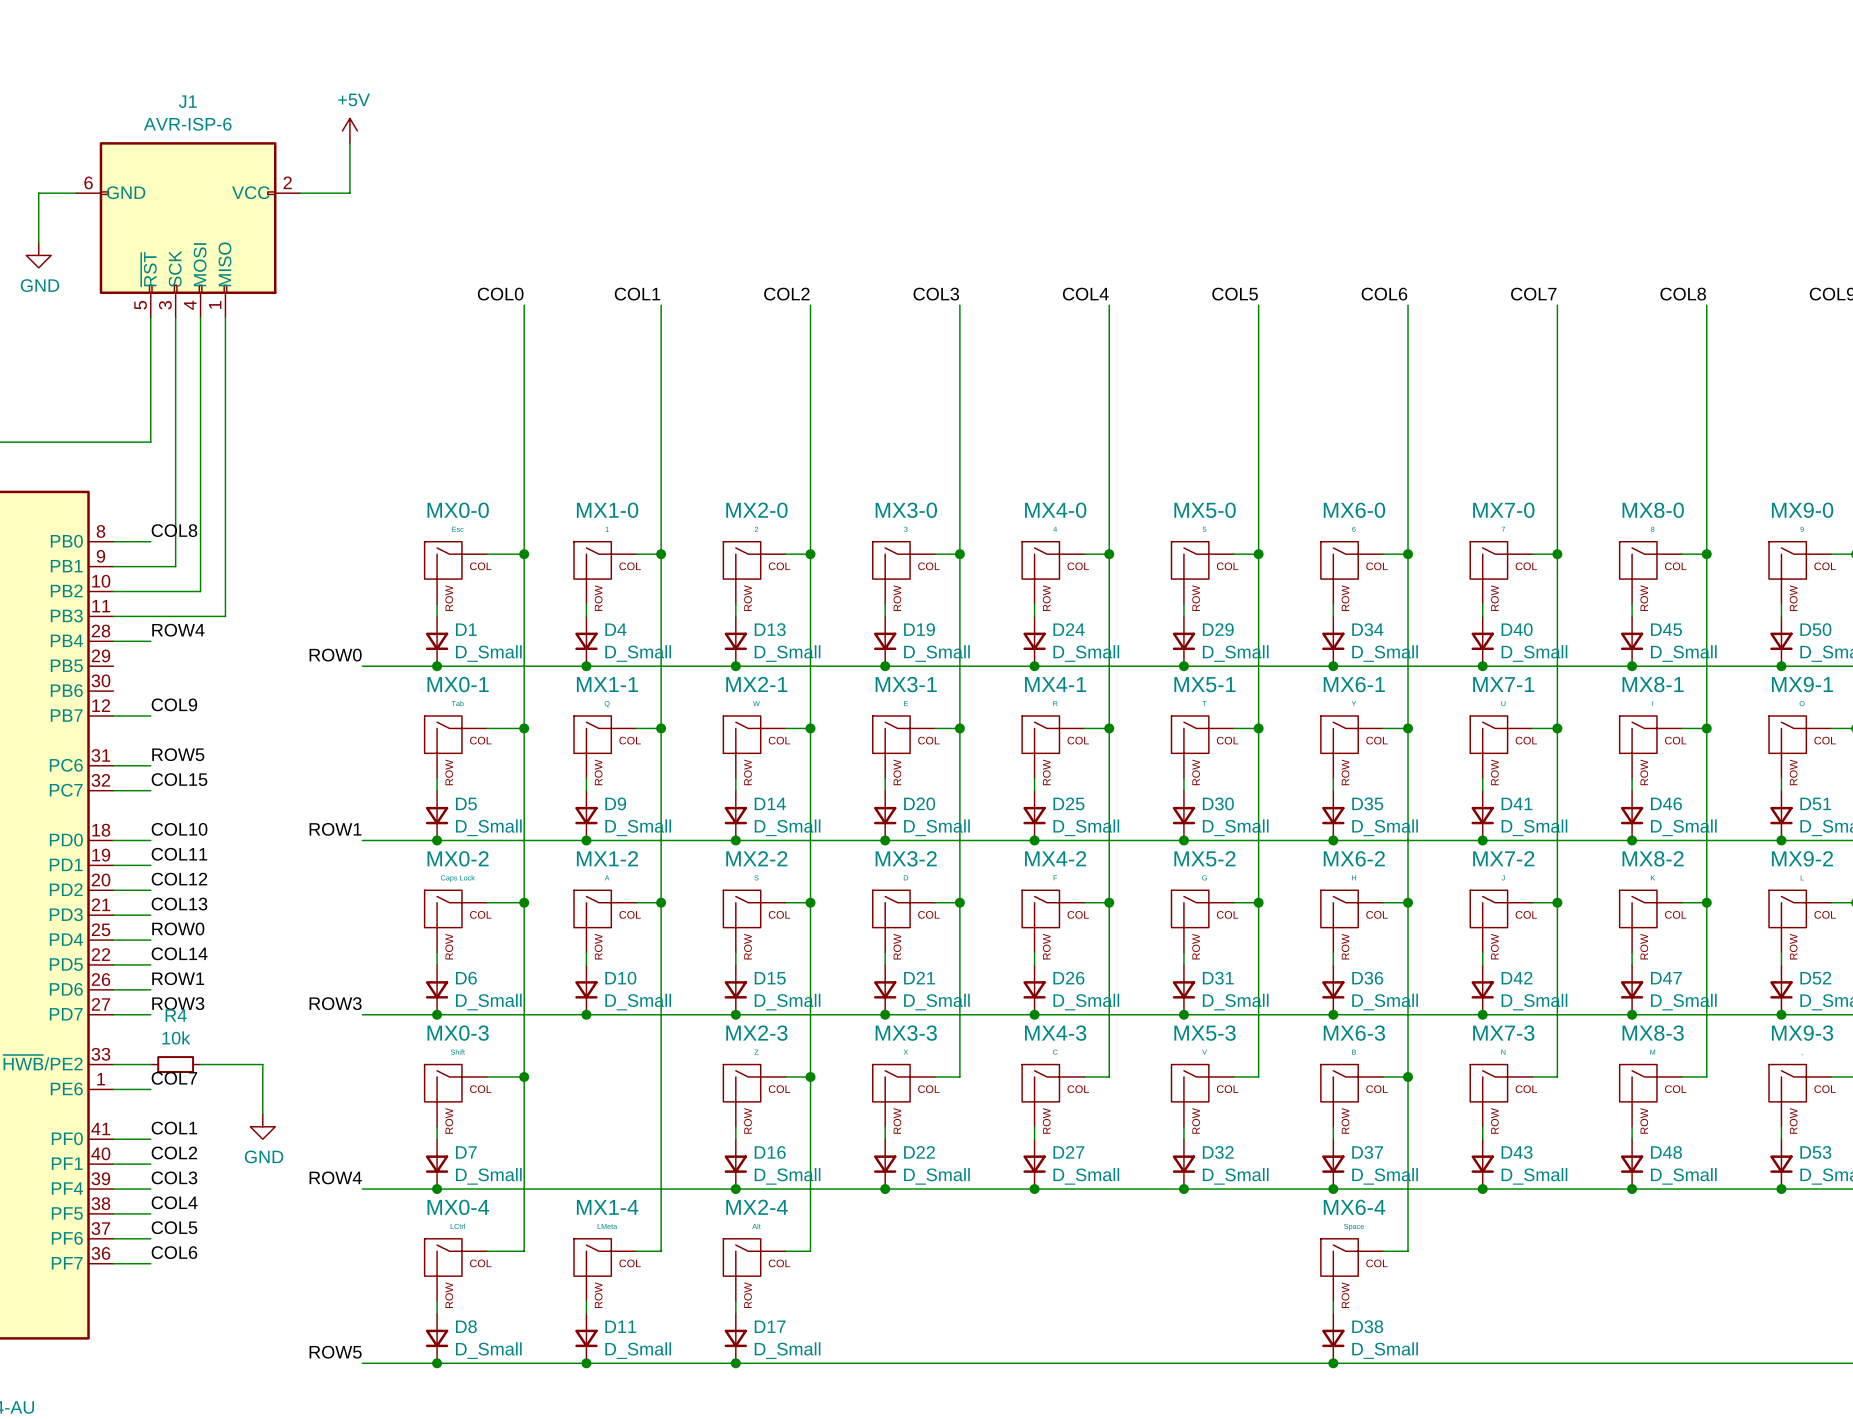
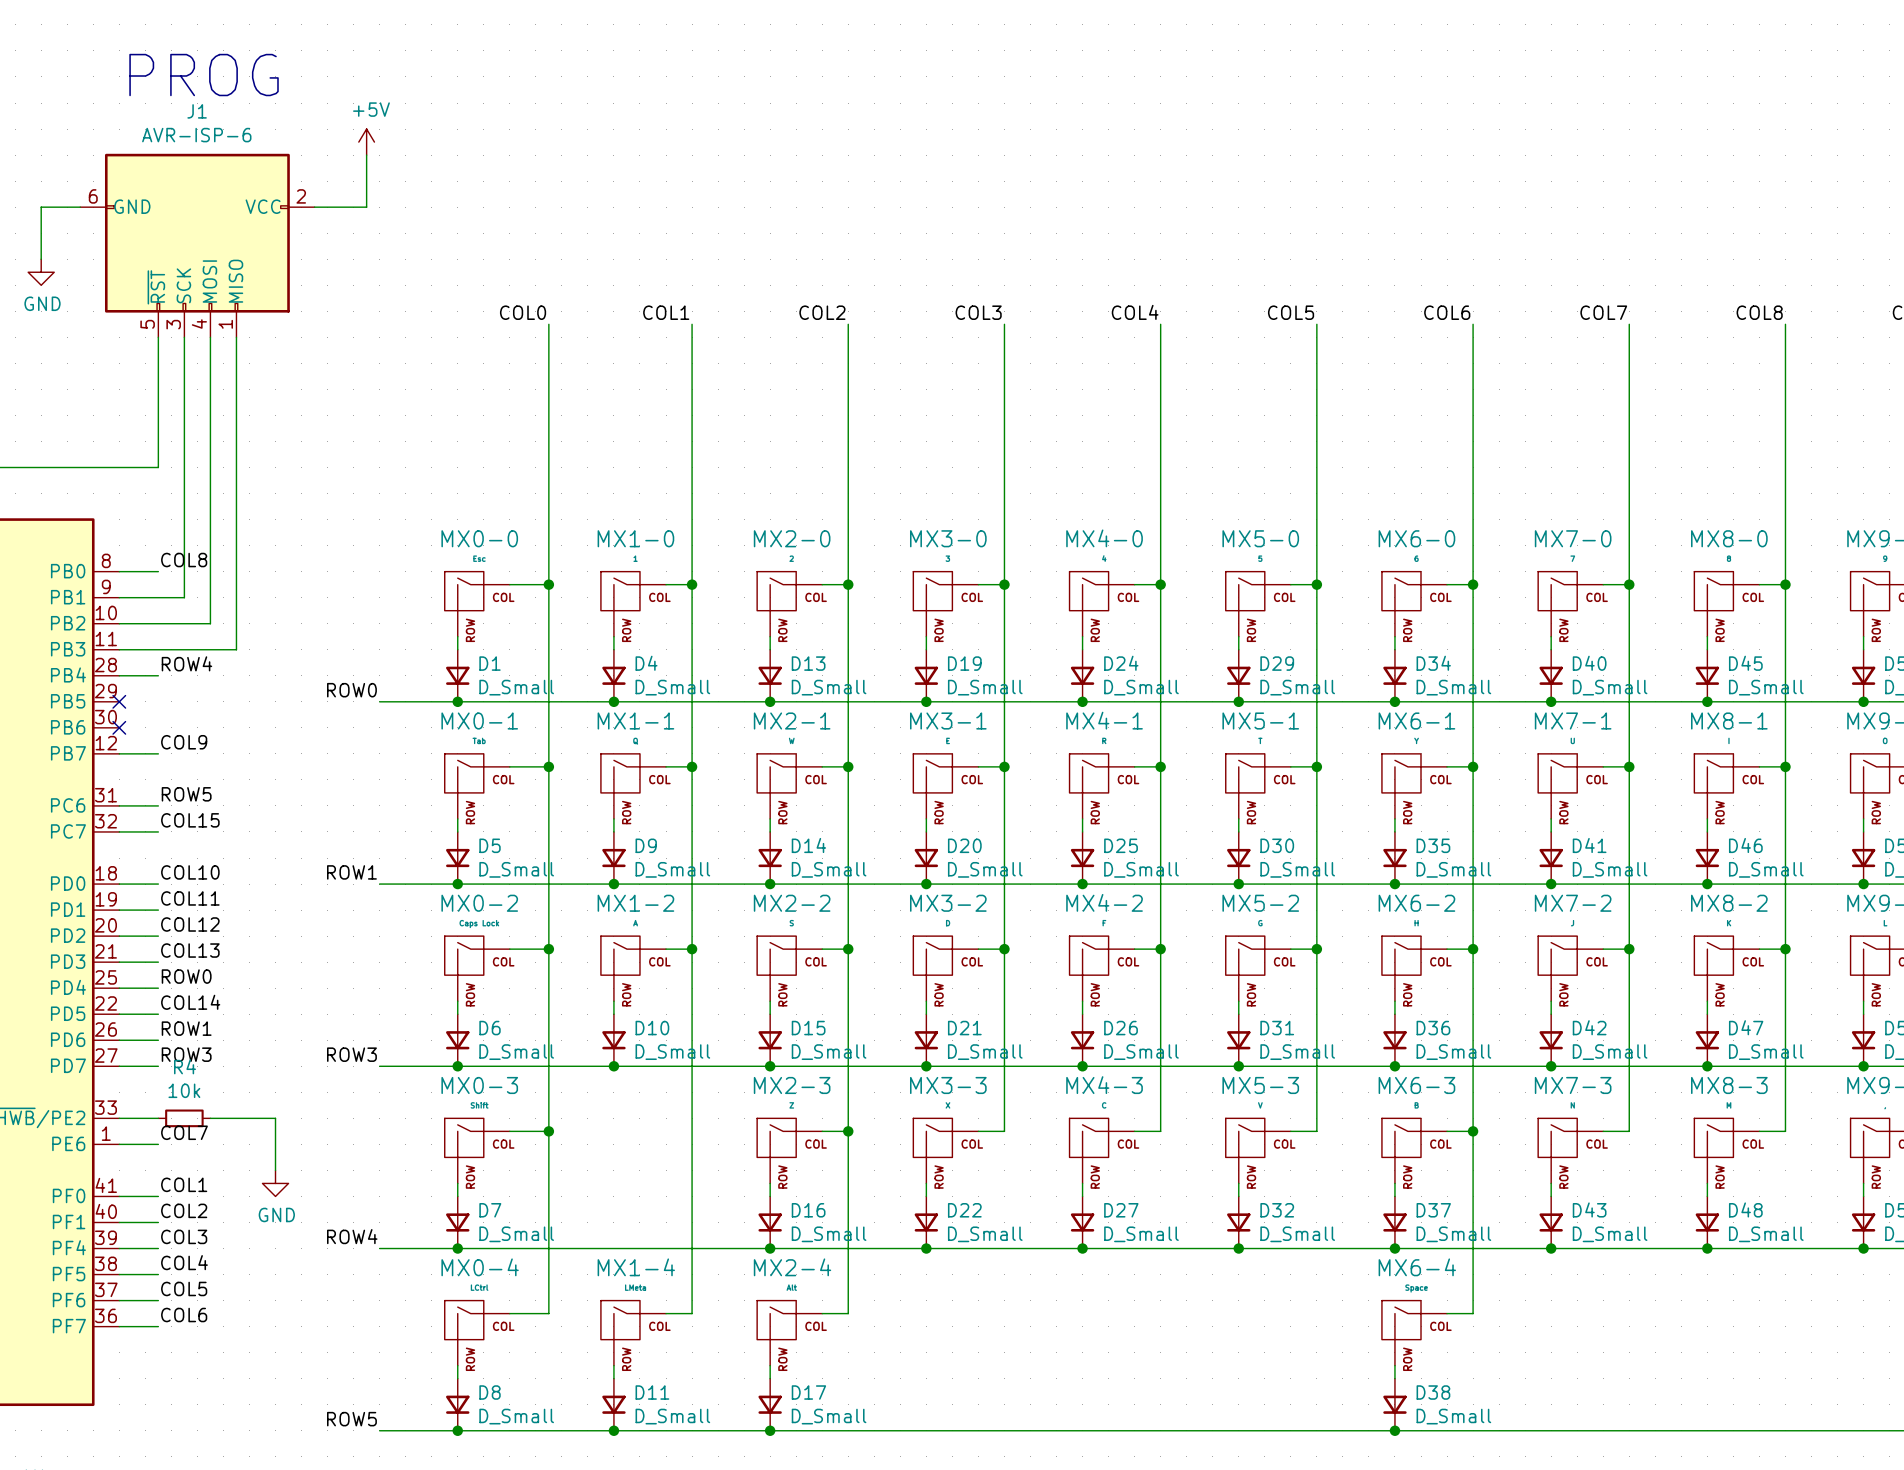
text: none -> PROG (204, 75)
no-connect mark: none -> (119, 701)
no-connect mark: none -> (119, 727)

